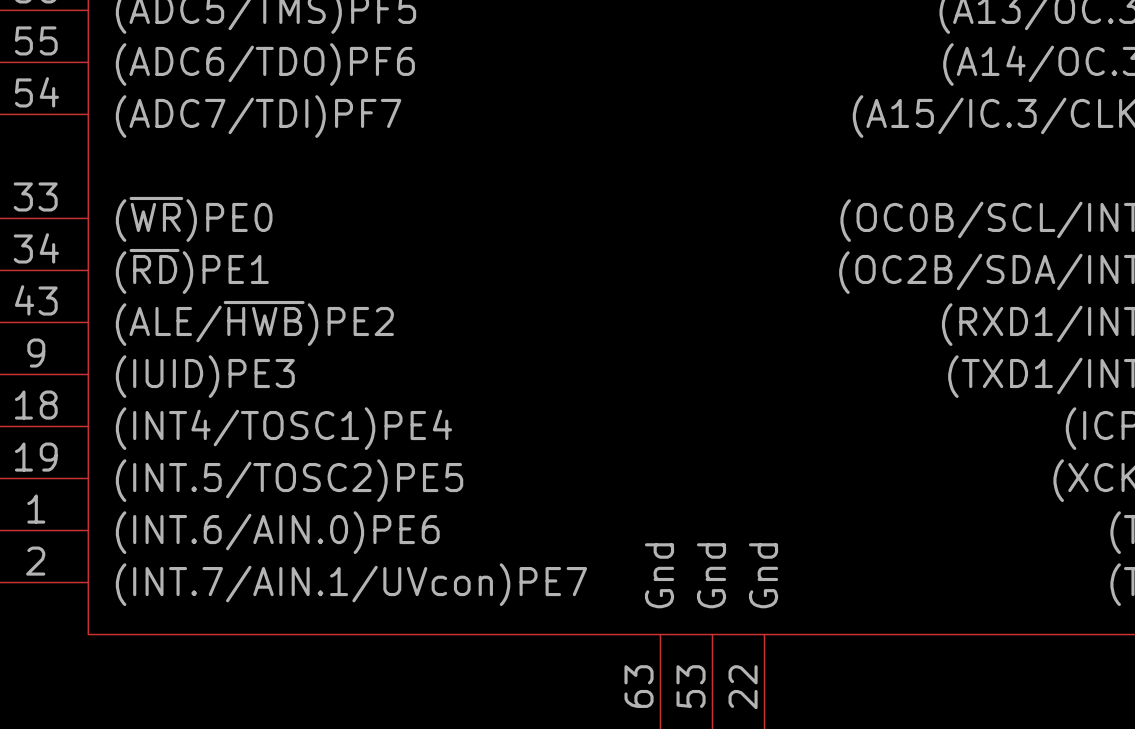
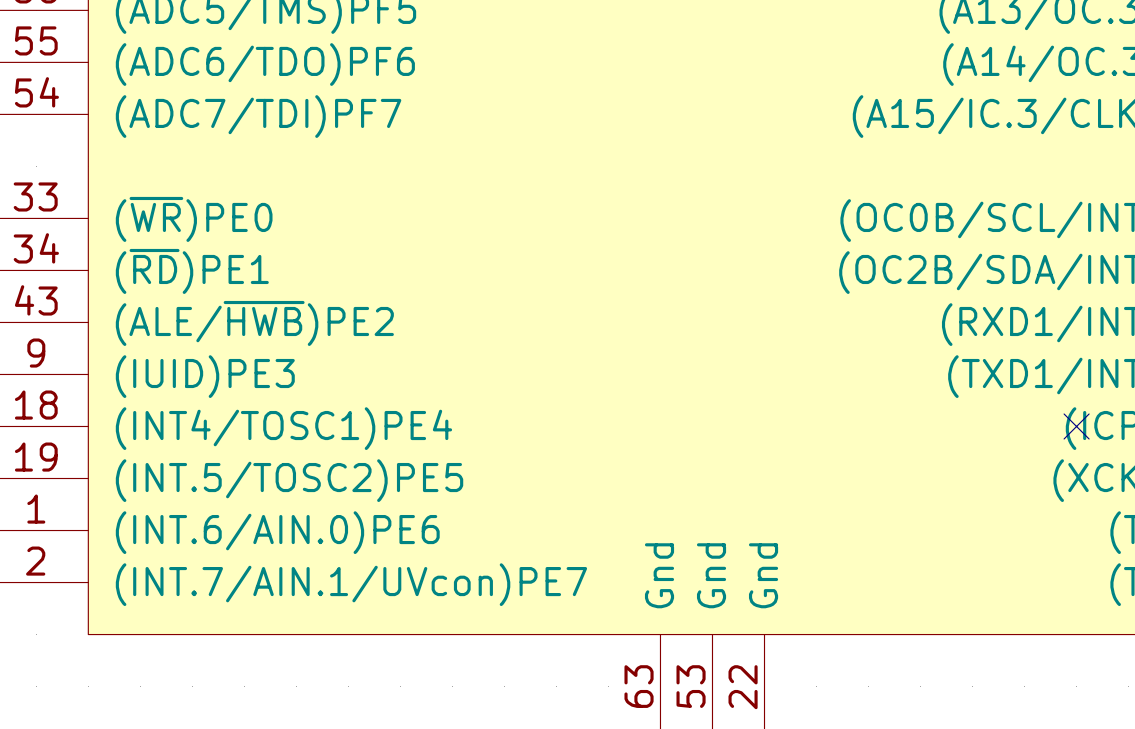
no-connect mark: none -> (1076, 426)

